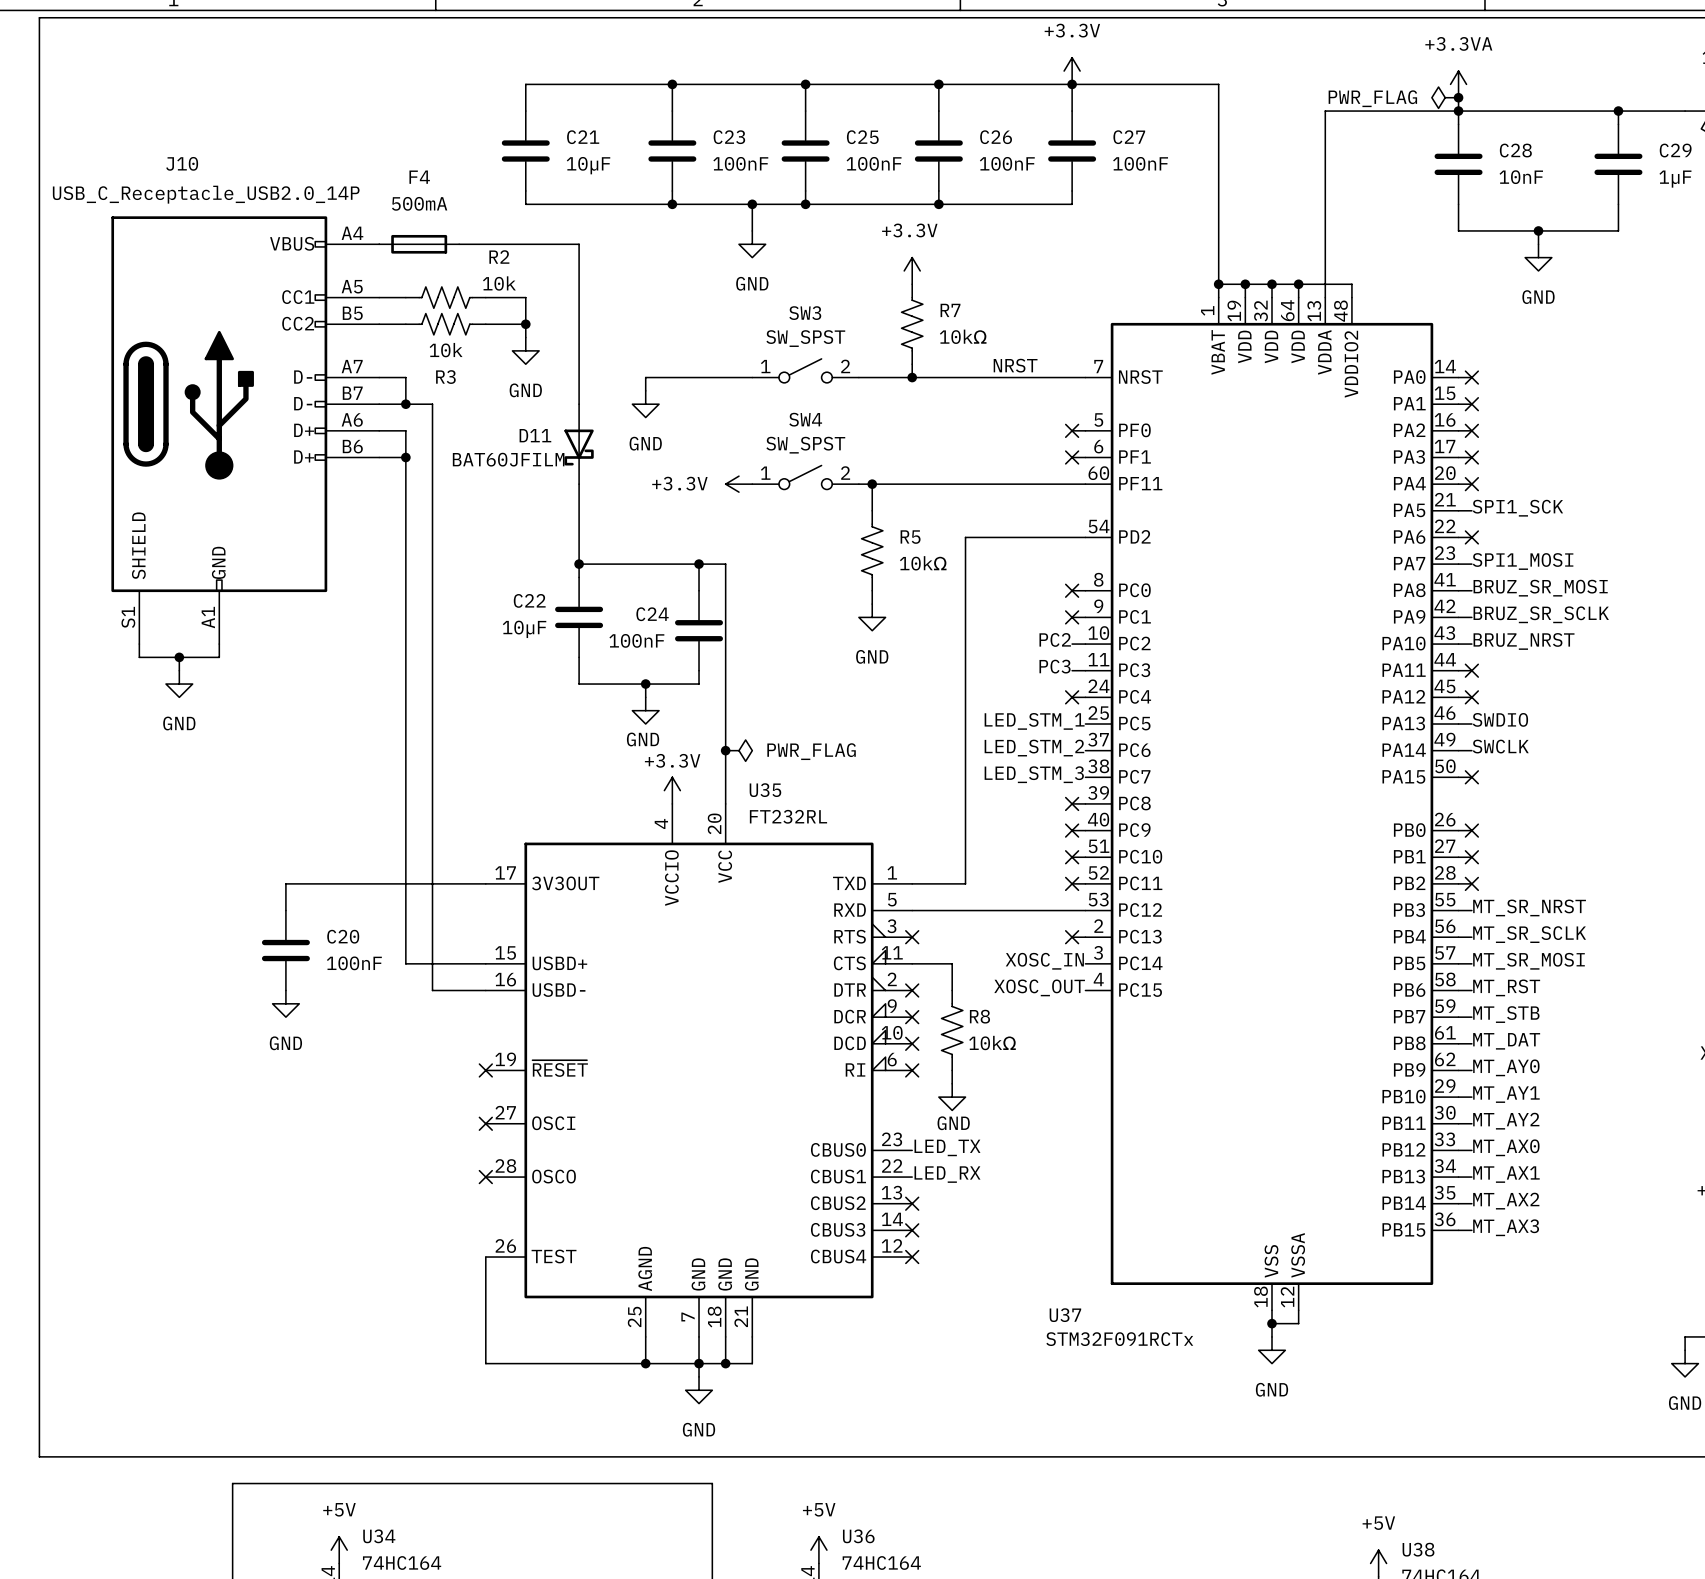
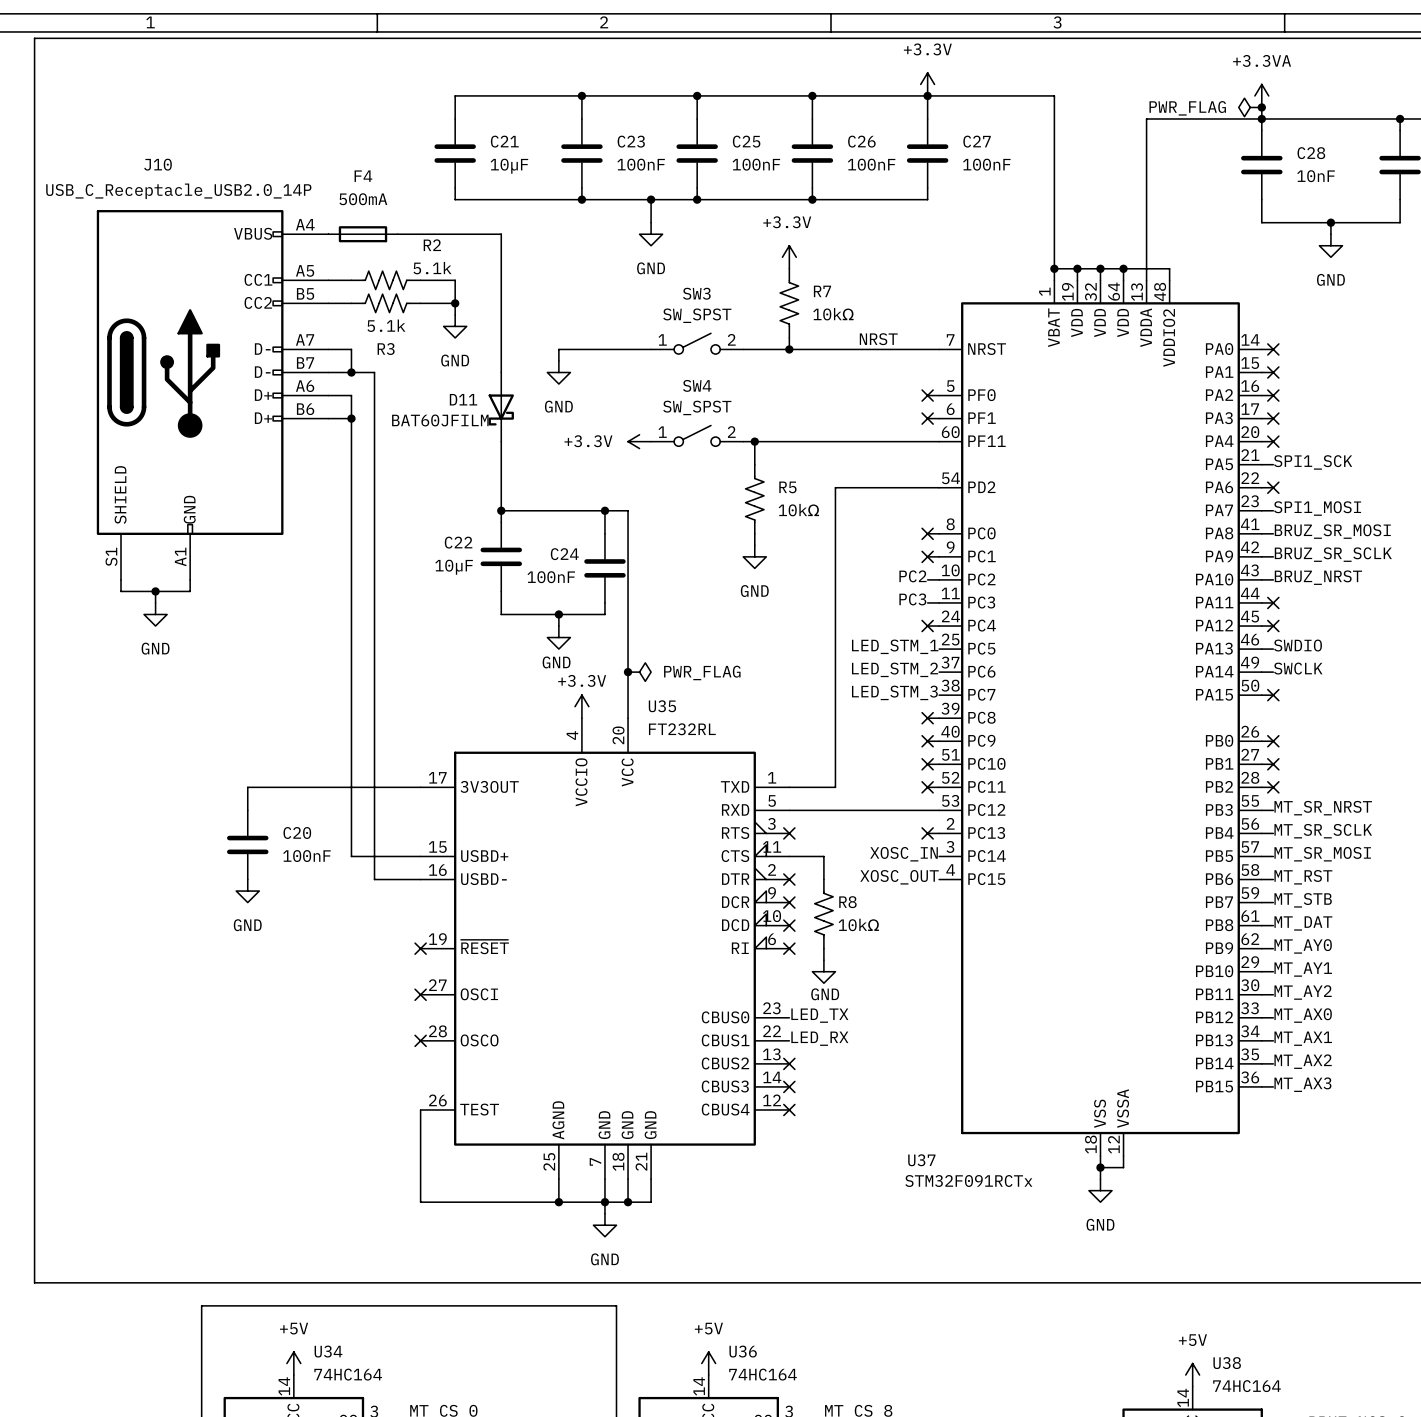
R2 value: 10k (499, 283) -> 5.1k (432, 268)
R3 value: 10k (446, 350) -> 5.1k (386, 325)

